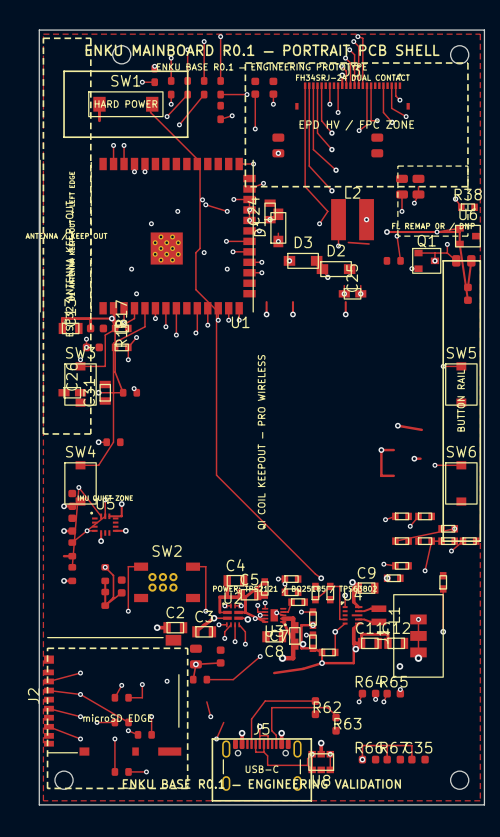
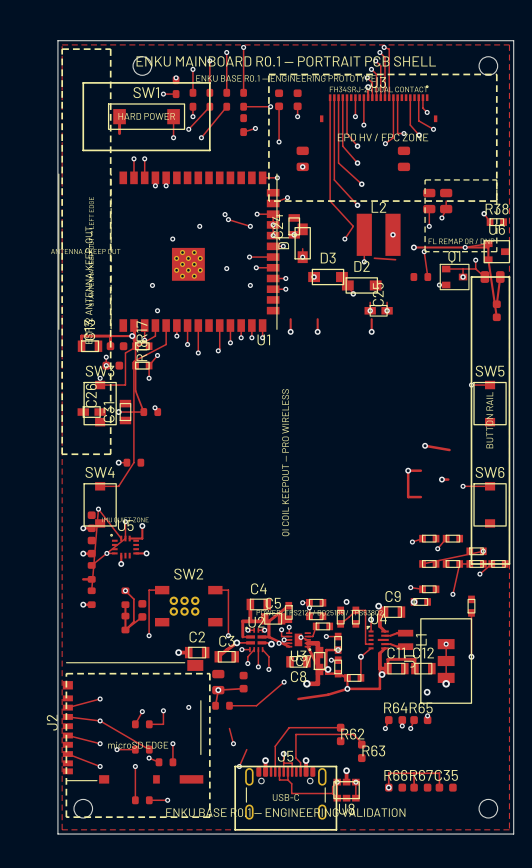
track: (152, 104) (150, 104) (150, 112) (200, 161) (200, 248) (195, 252) (195, 289) (216, 310) (216, 475) (321, 578) -> (173, 116) (173, 137)
via: none -> (173, 137)

